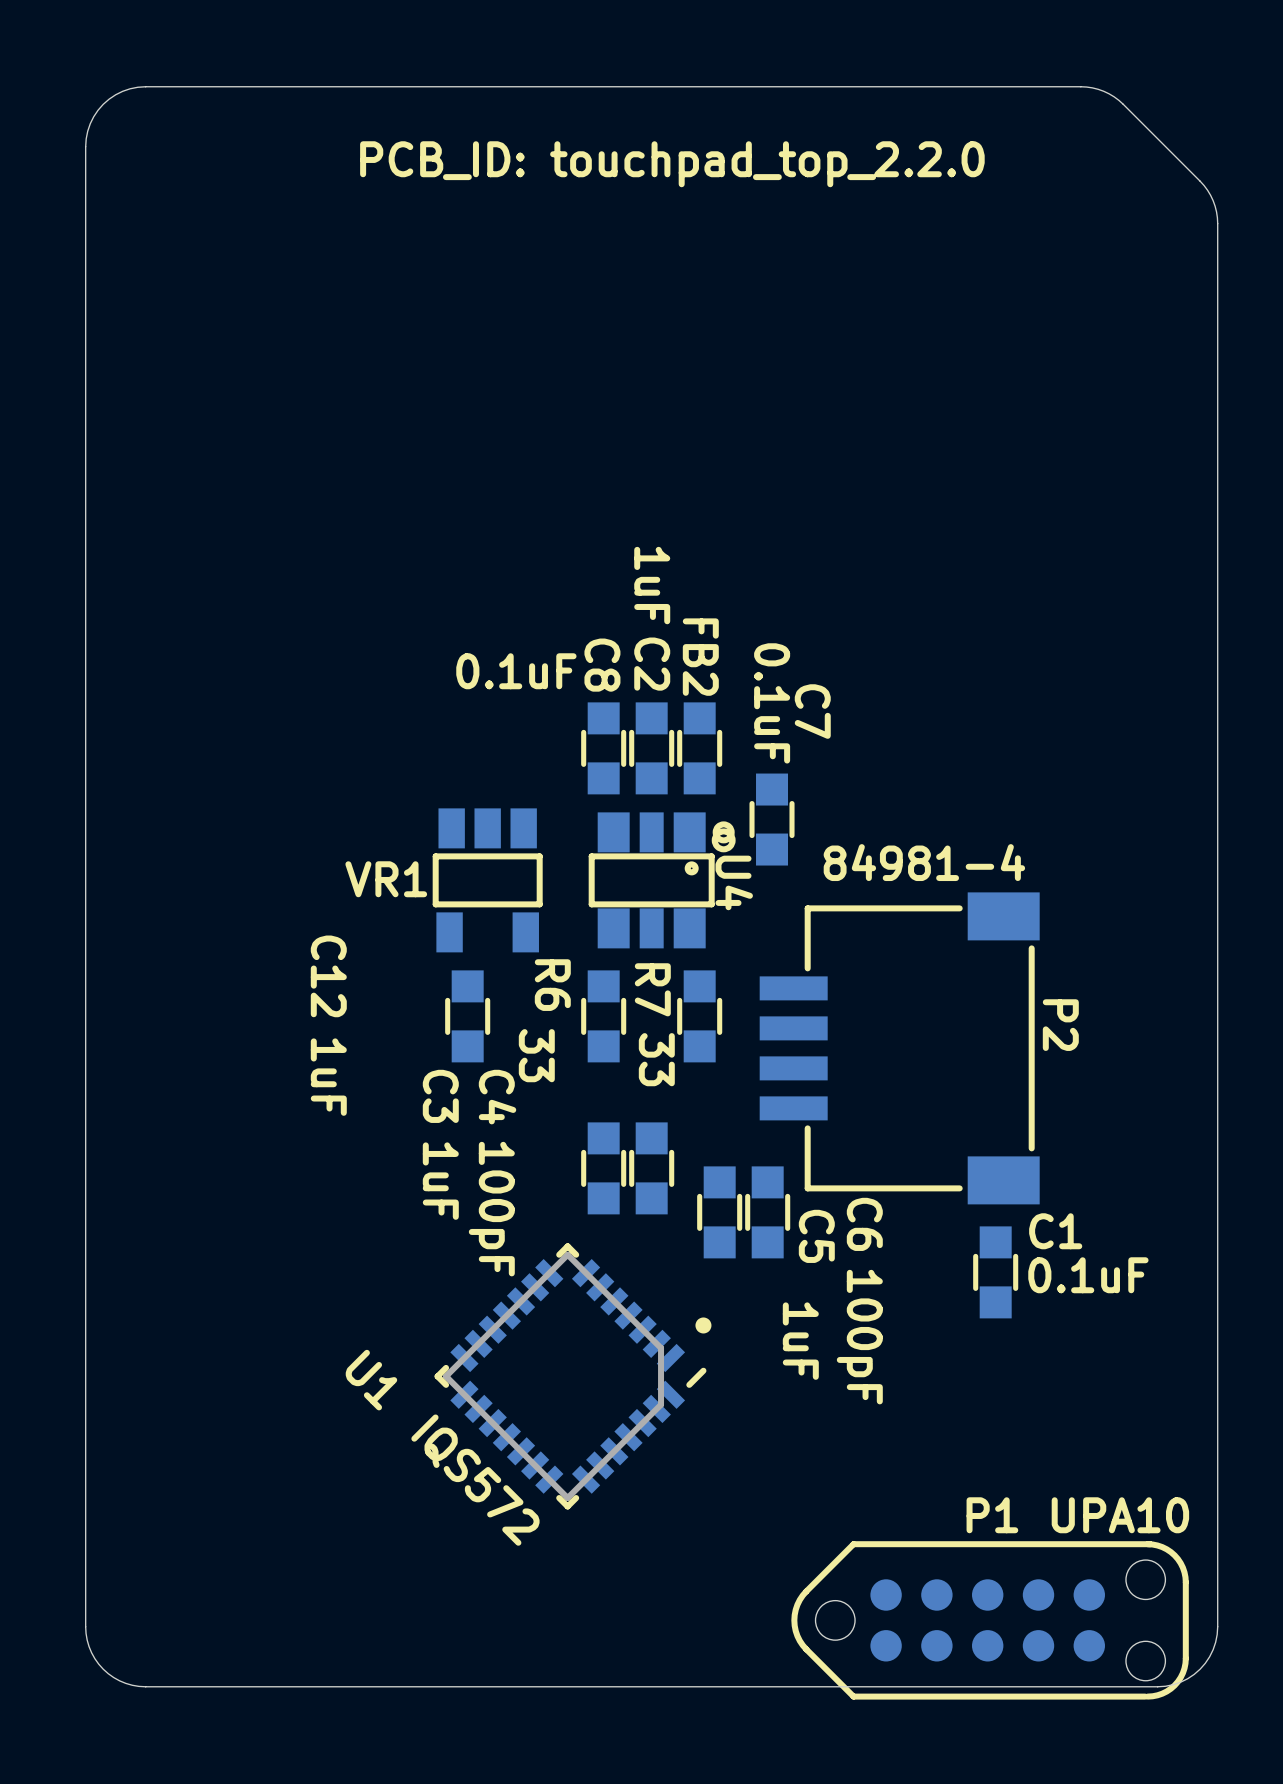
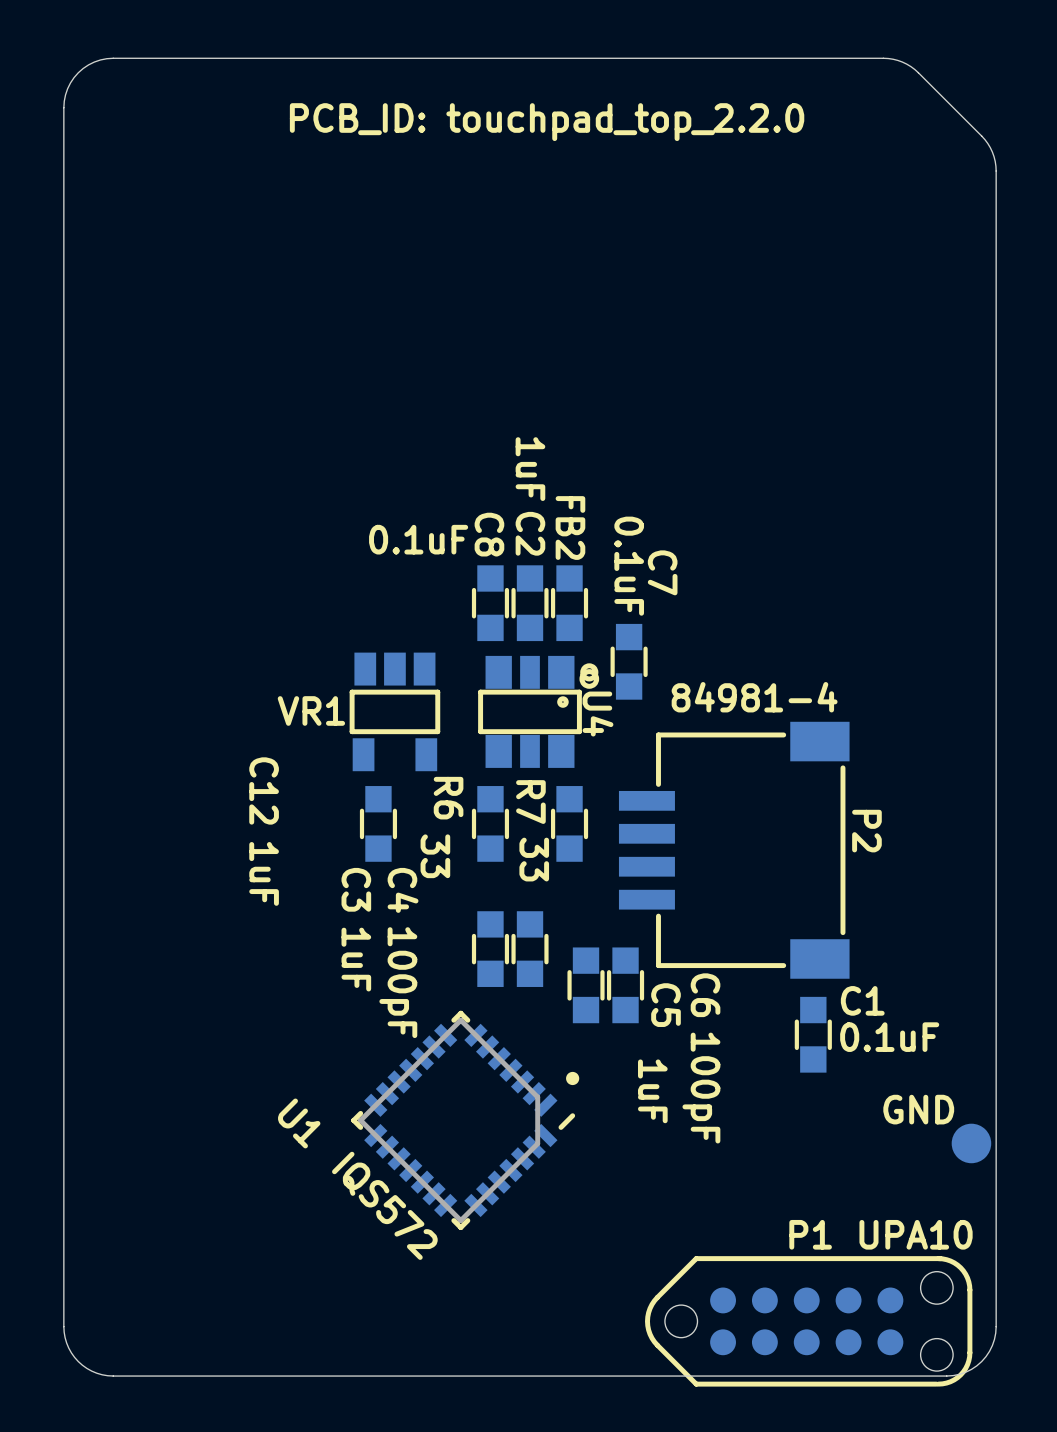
part: none -> GND (971, 1143)

